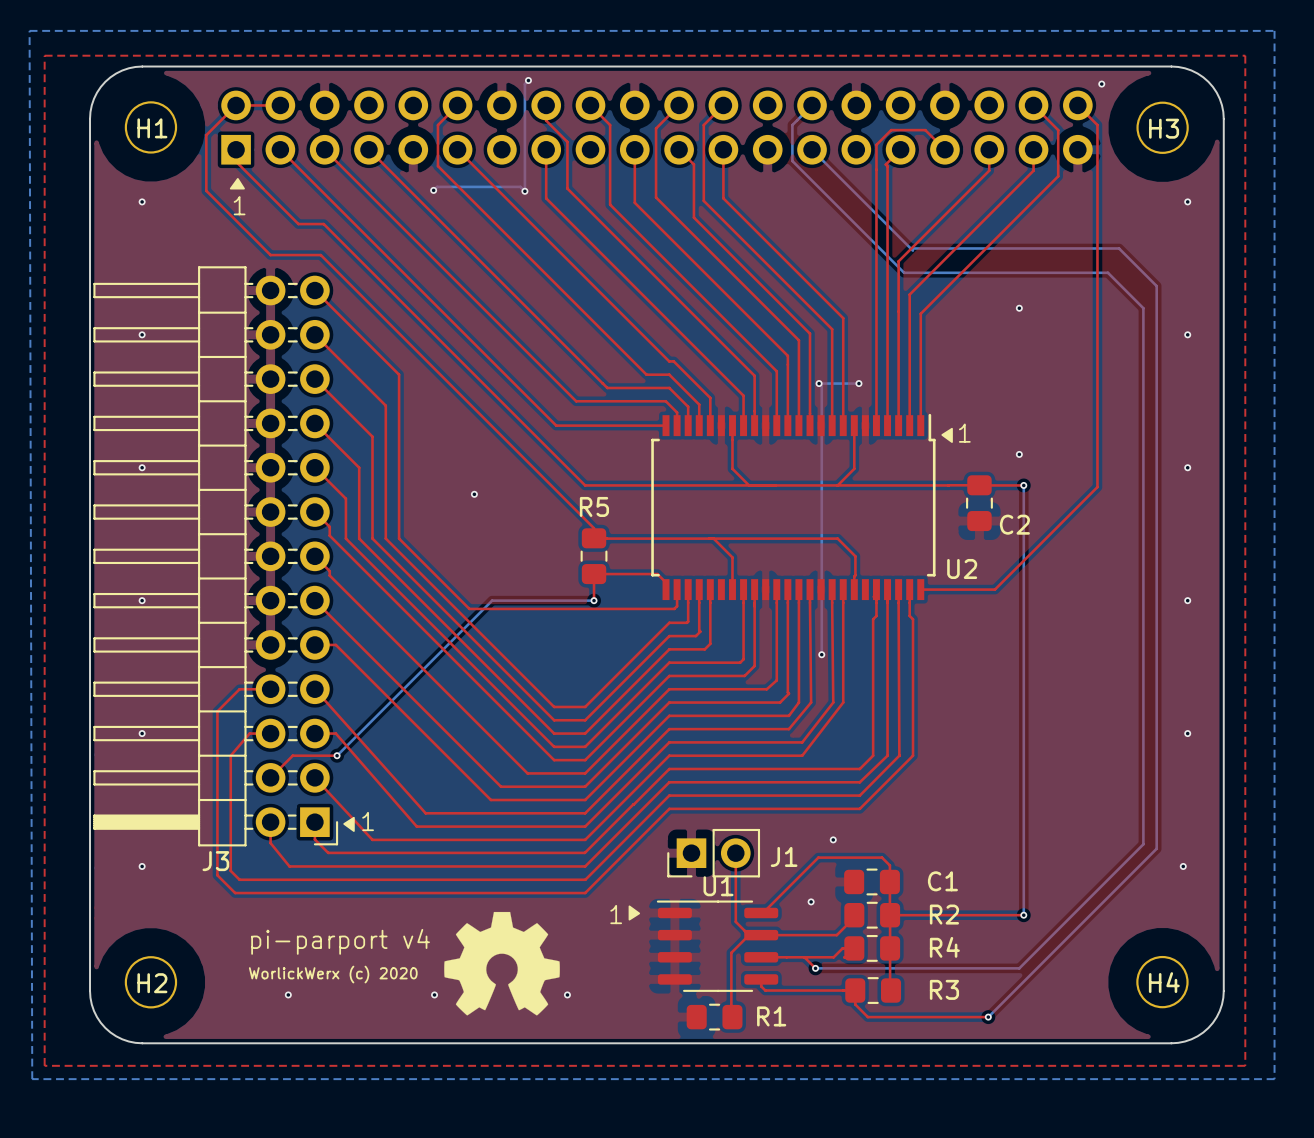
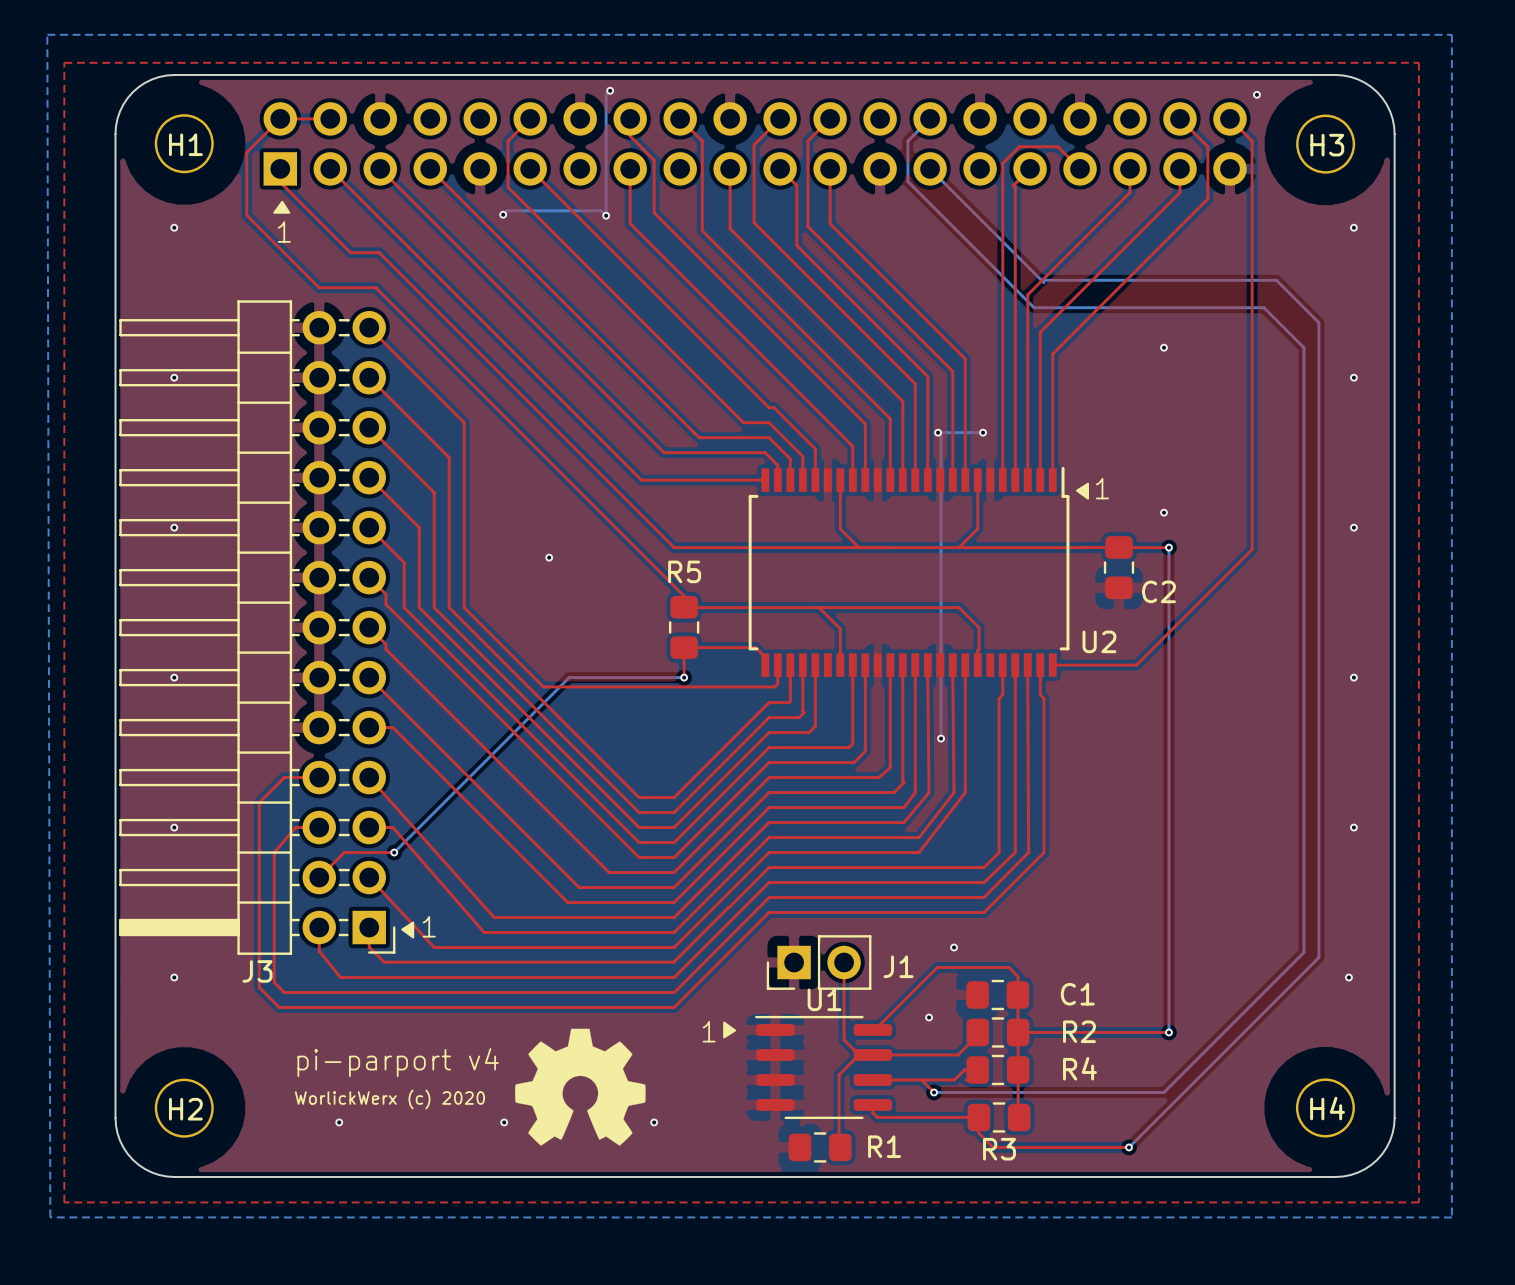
R3 name position: R3 (944, 989) -> R3 (999, 1149)

